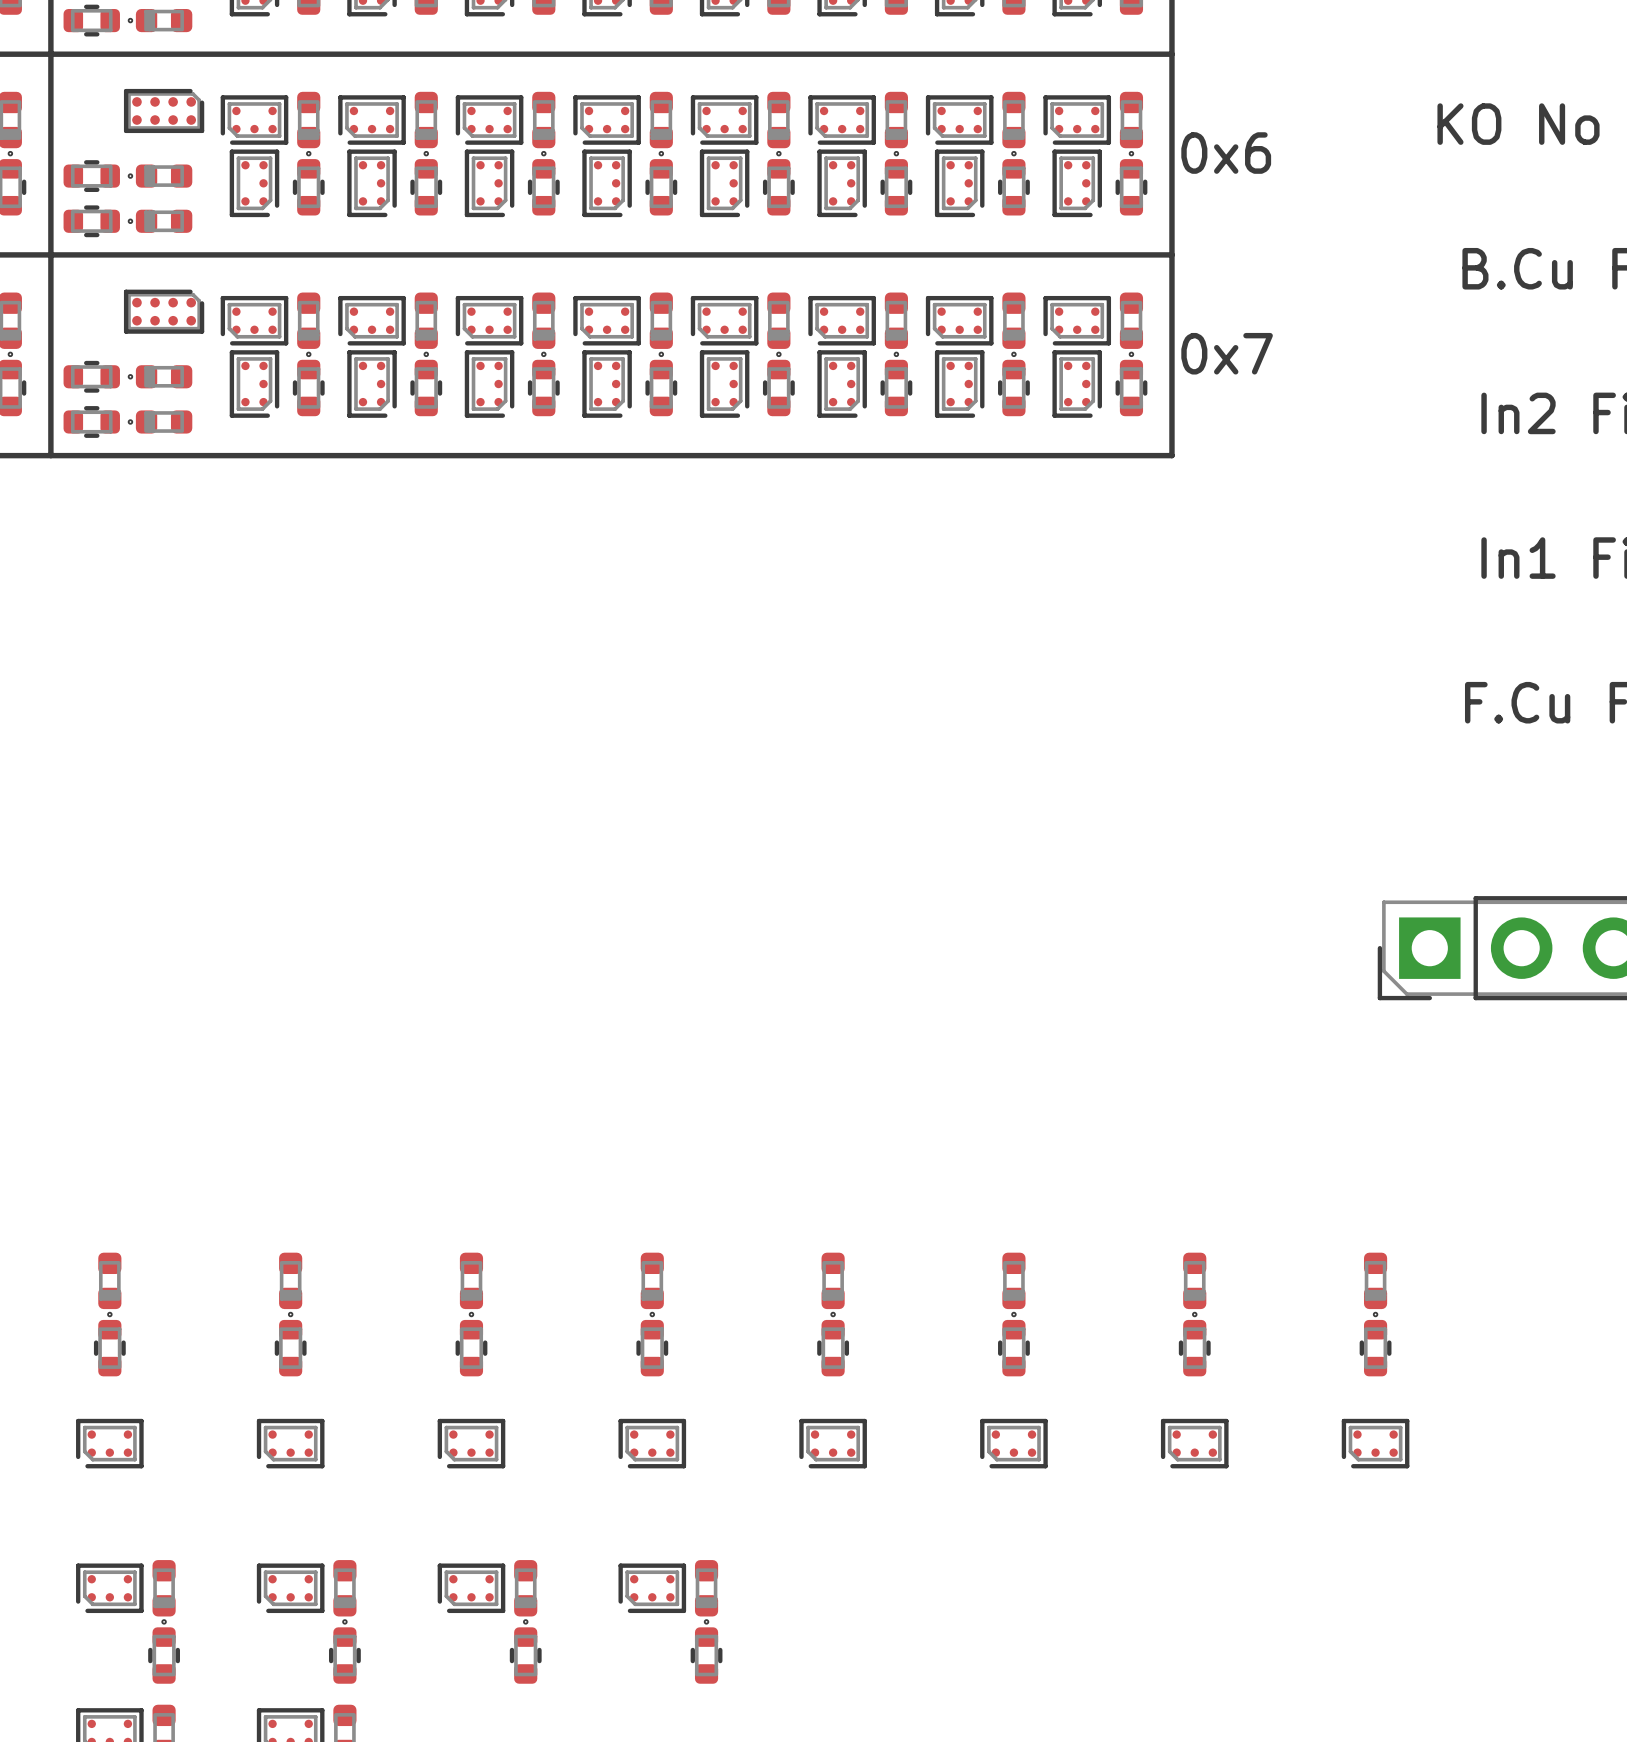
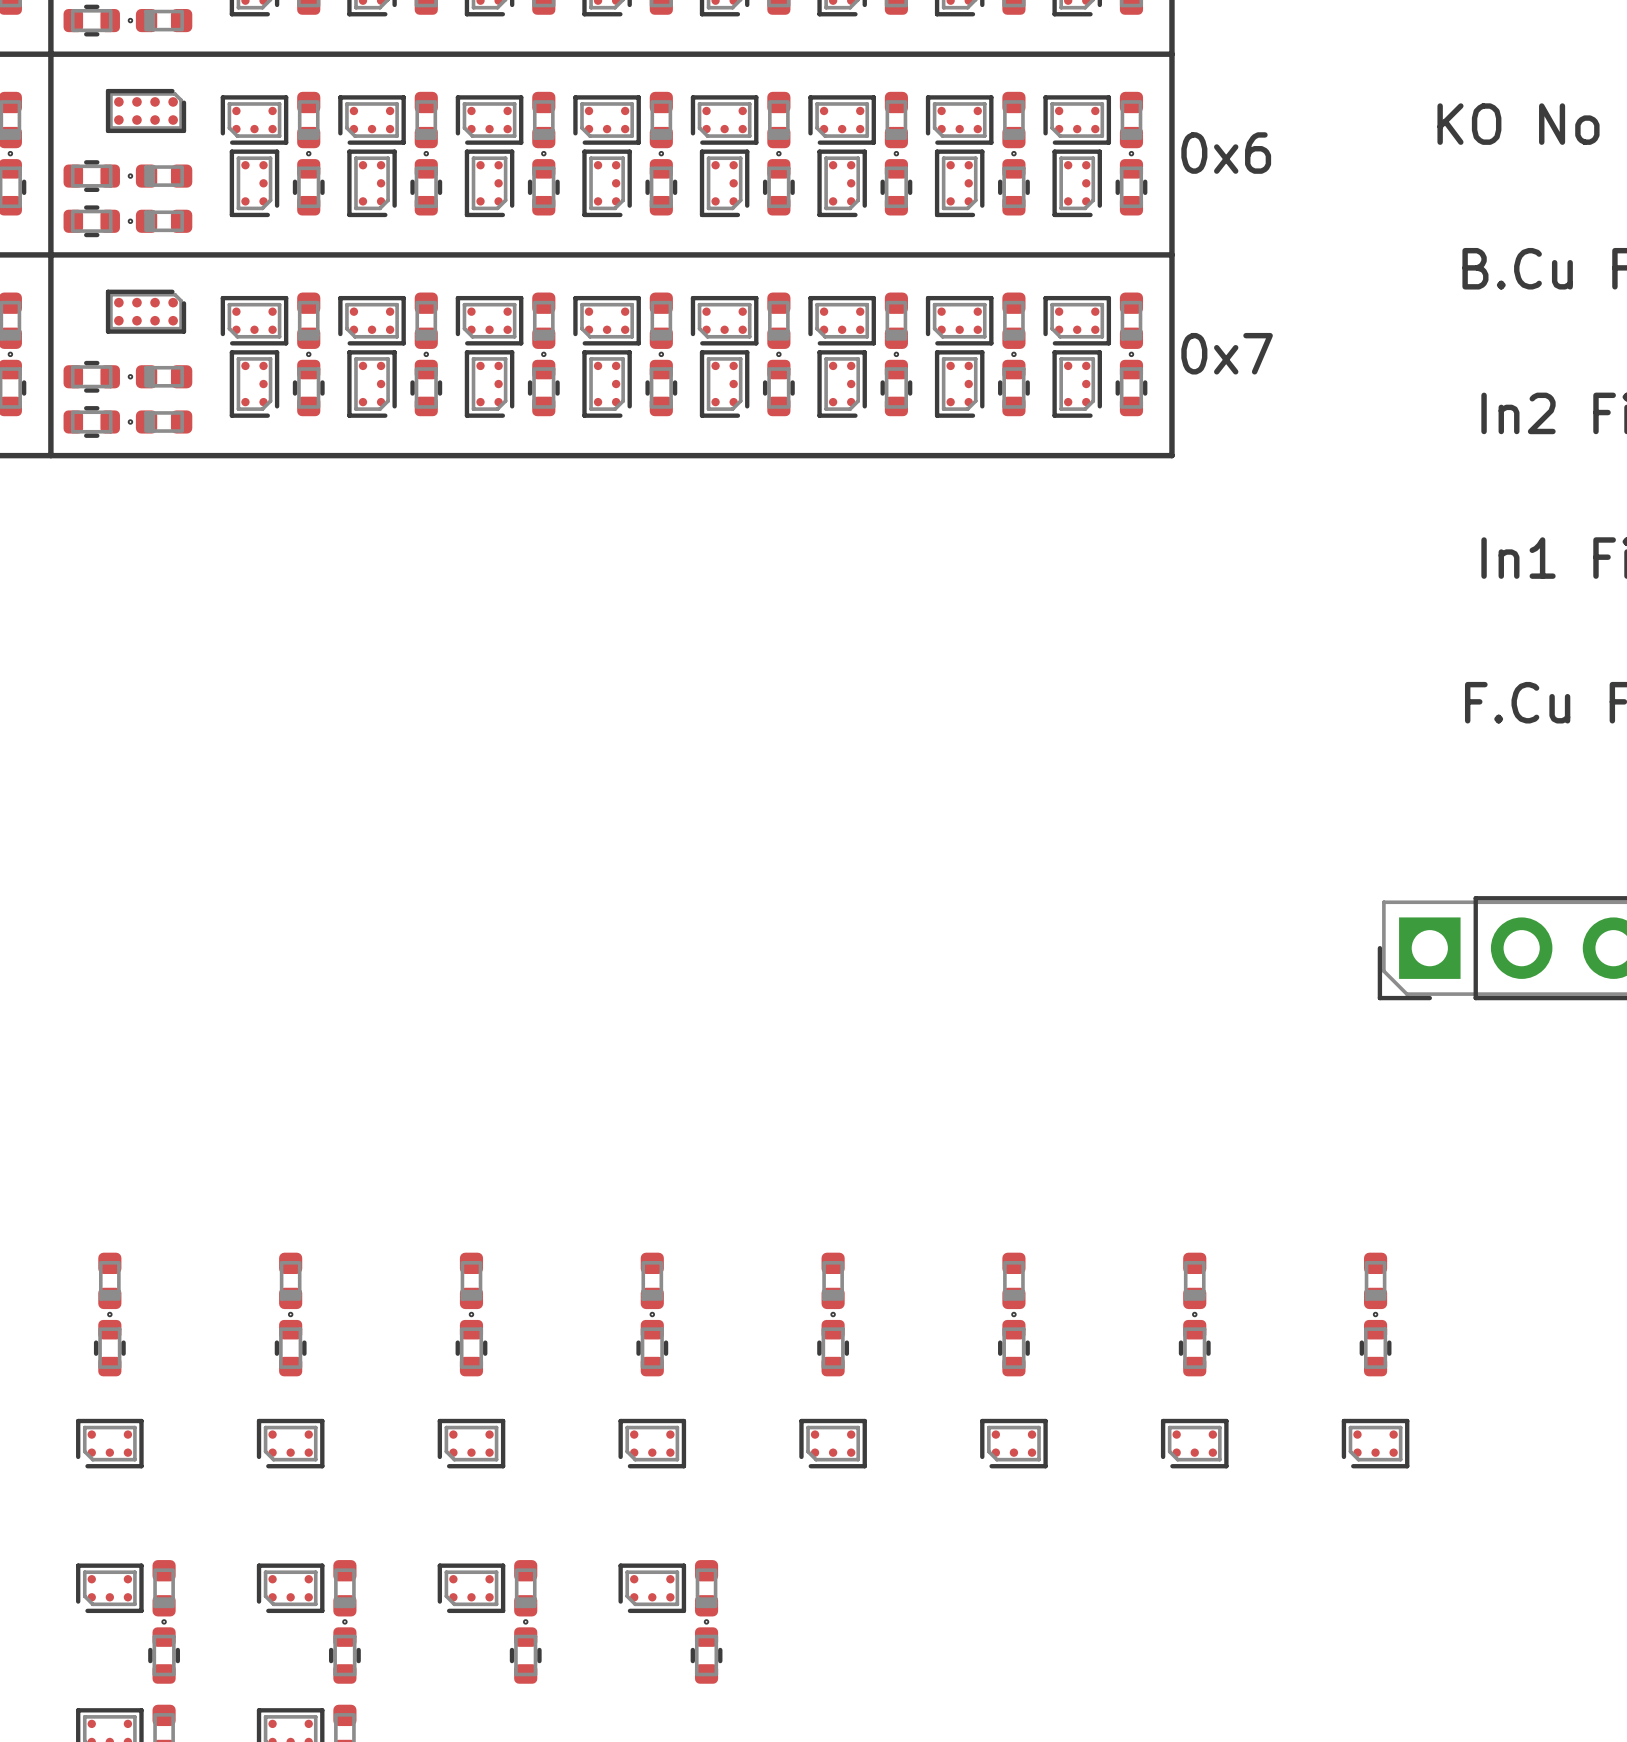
part position: (164, 110) -> (146, 110)
part position: (164, 311) -> (146, 311)

